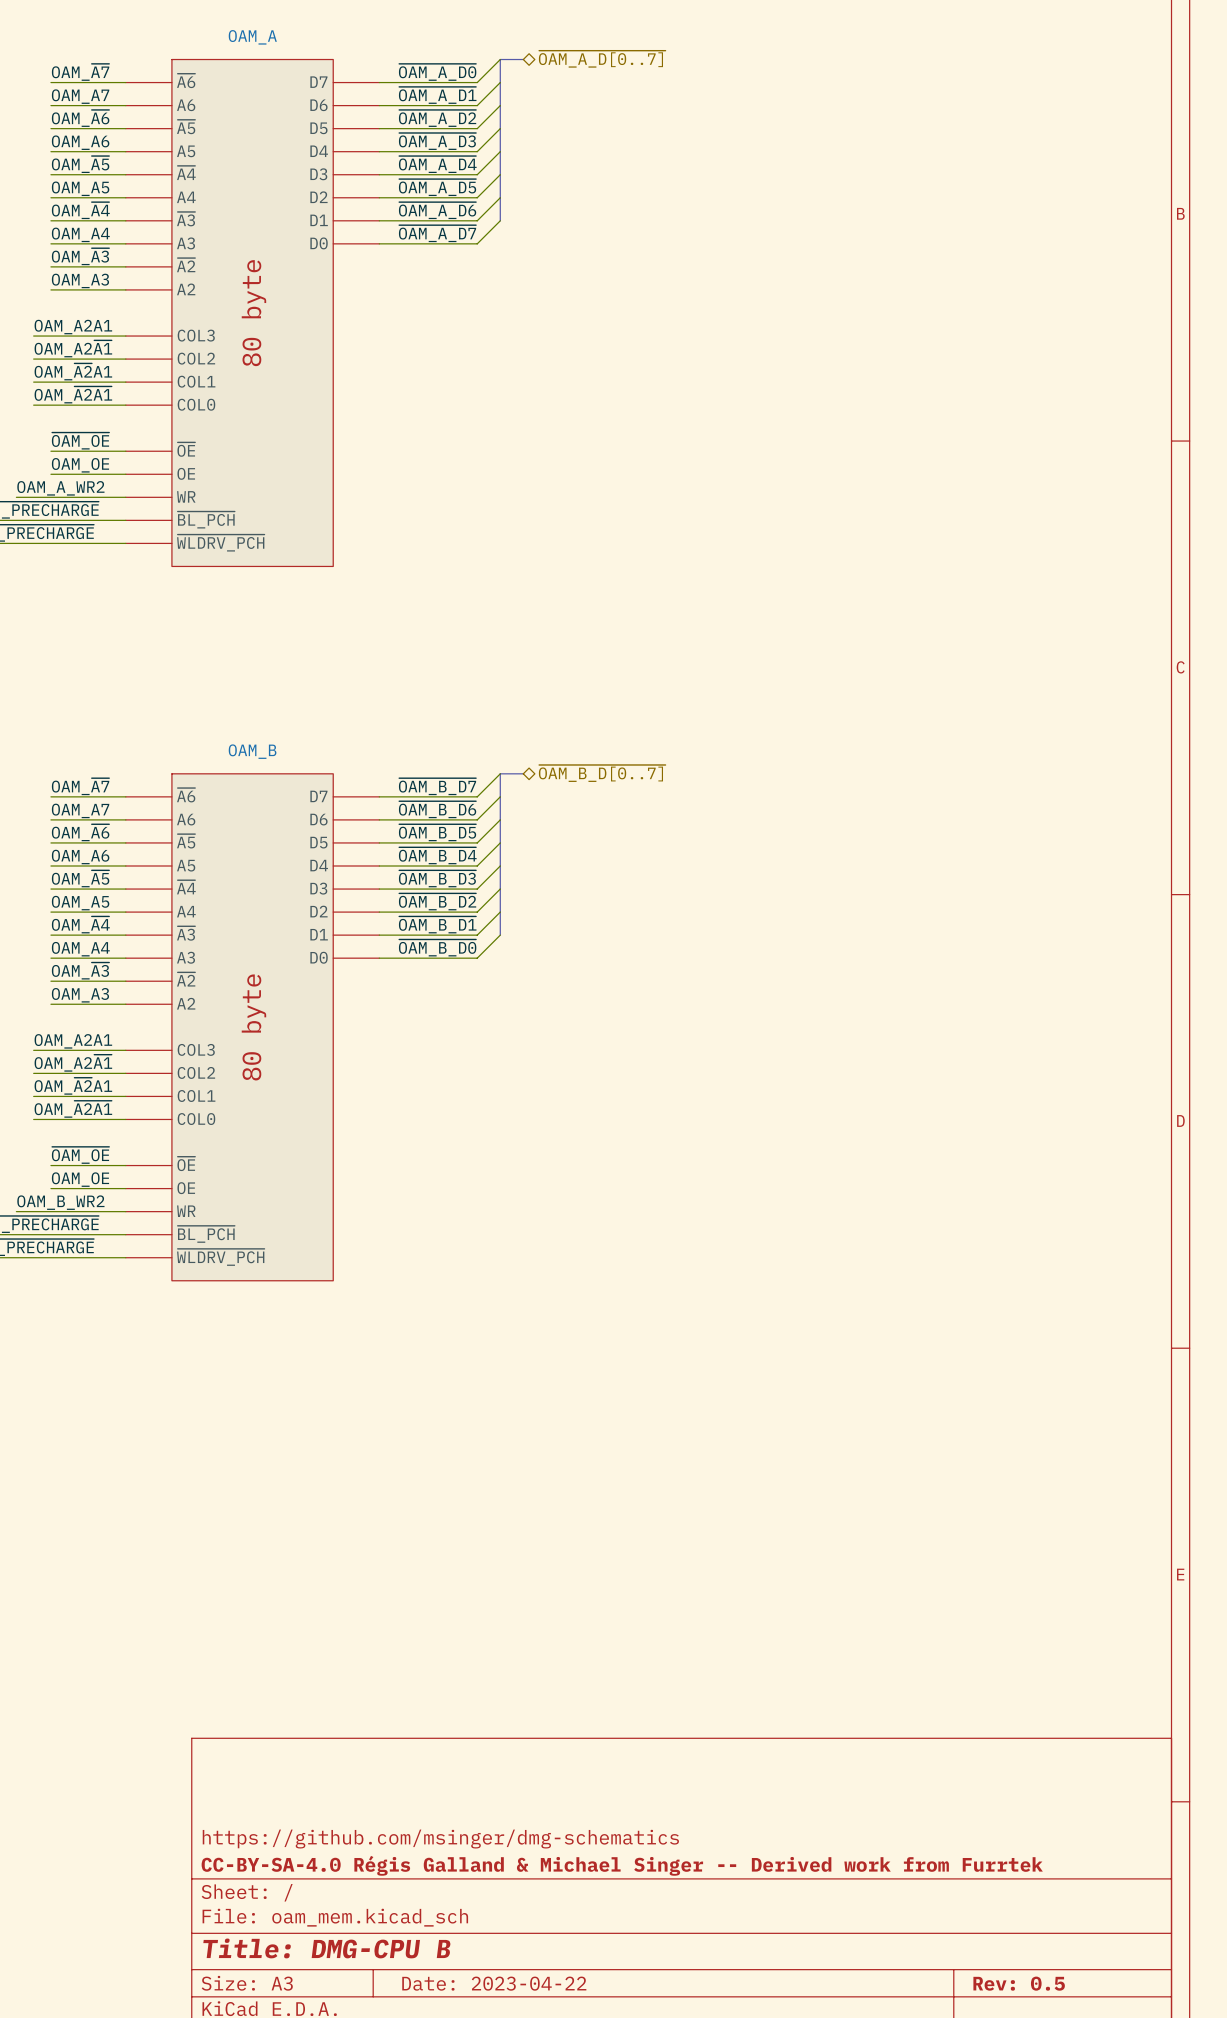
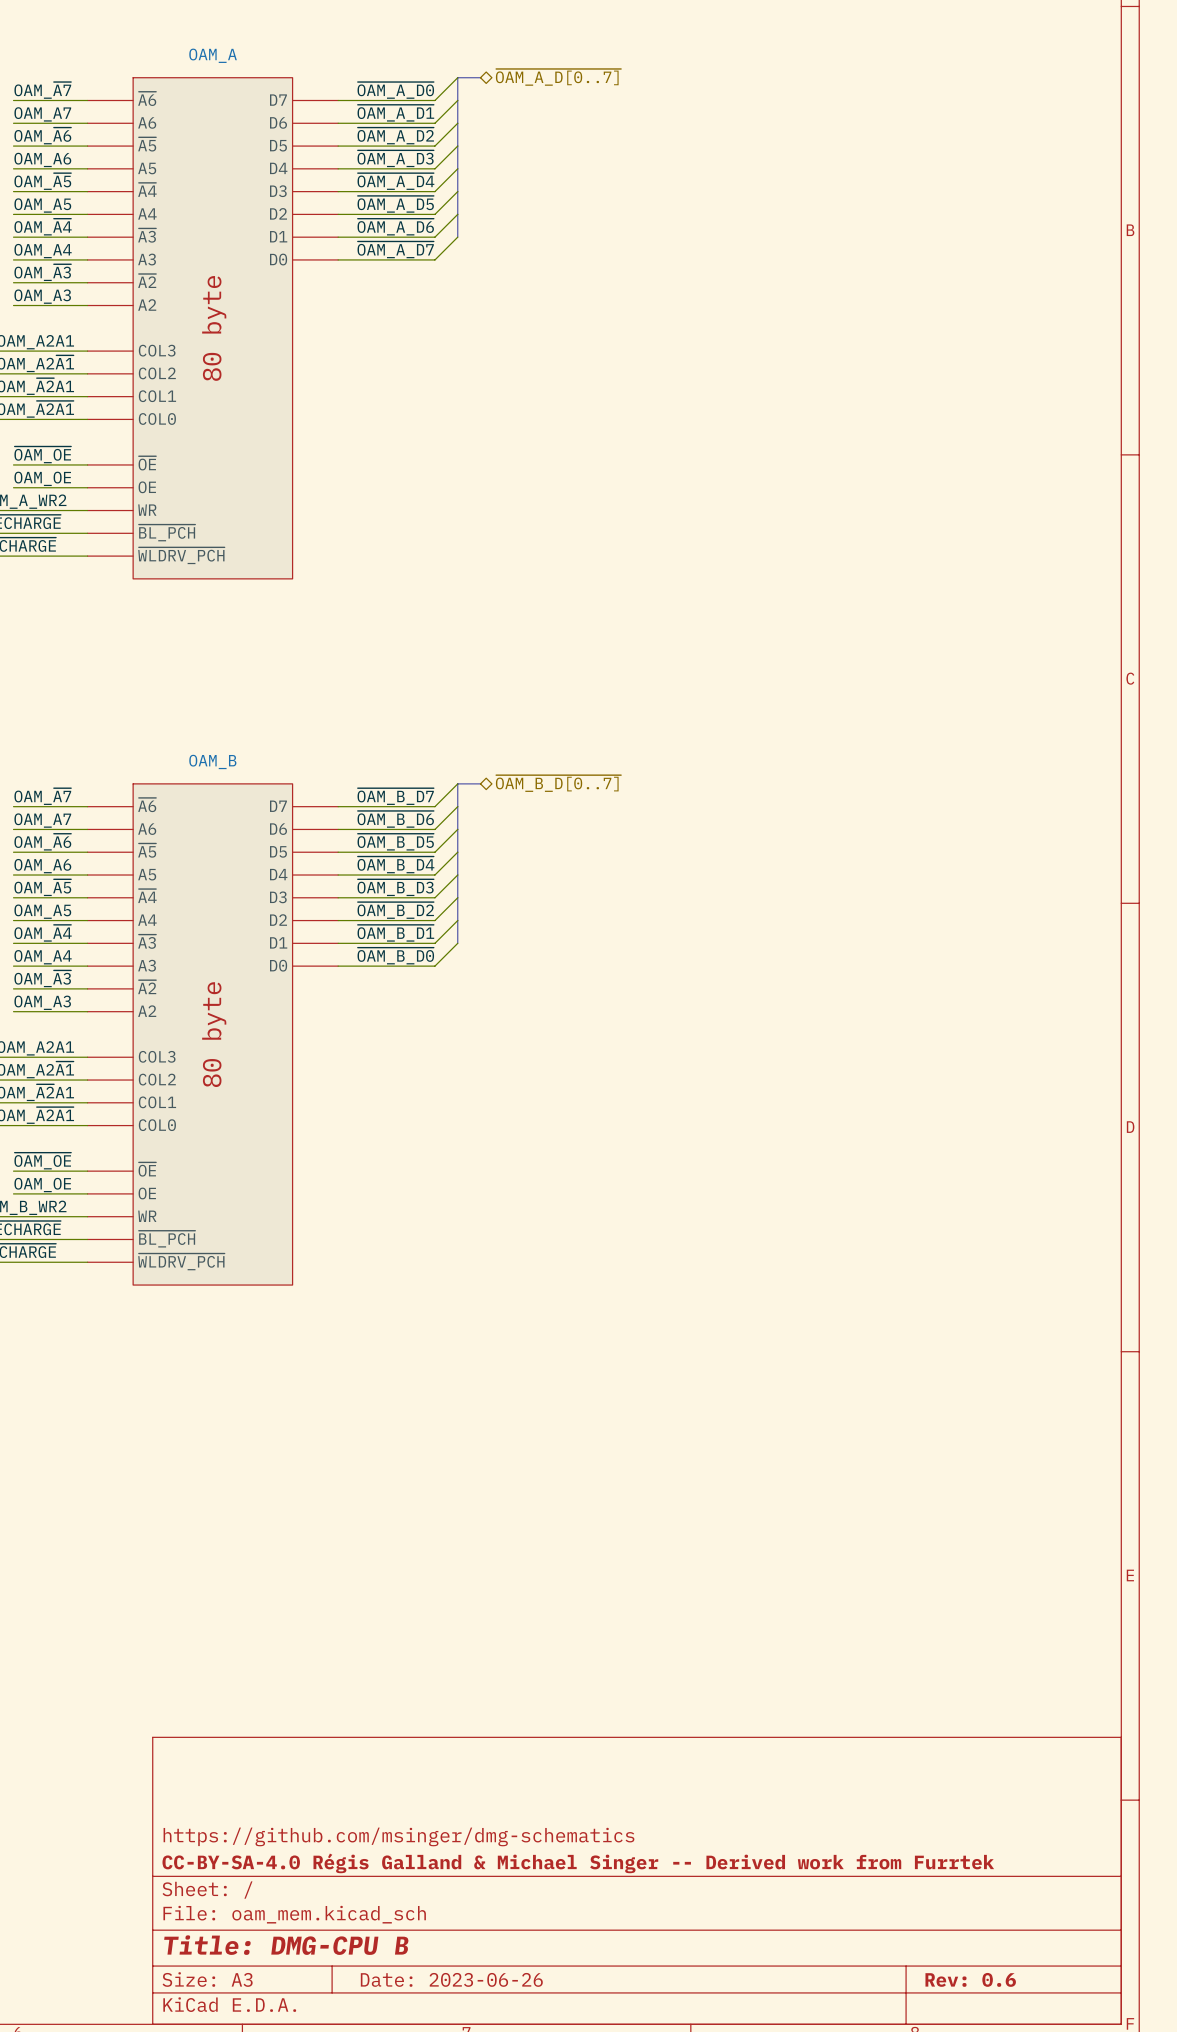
title block: Date: 2023-04-22 (494, 1983) -> Date: 2023-06-26 (451, 1979)
title block: Rev: 0.5 (1019, 1983) -> Rev: 0.6 (970, 1979)

